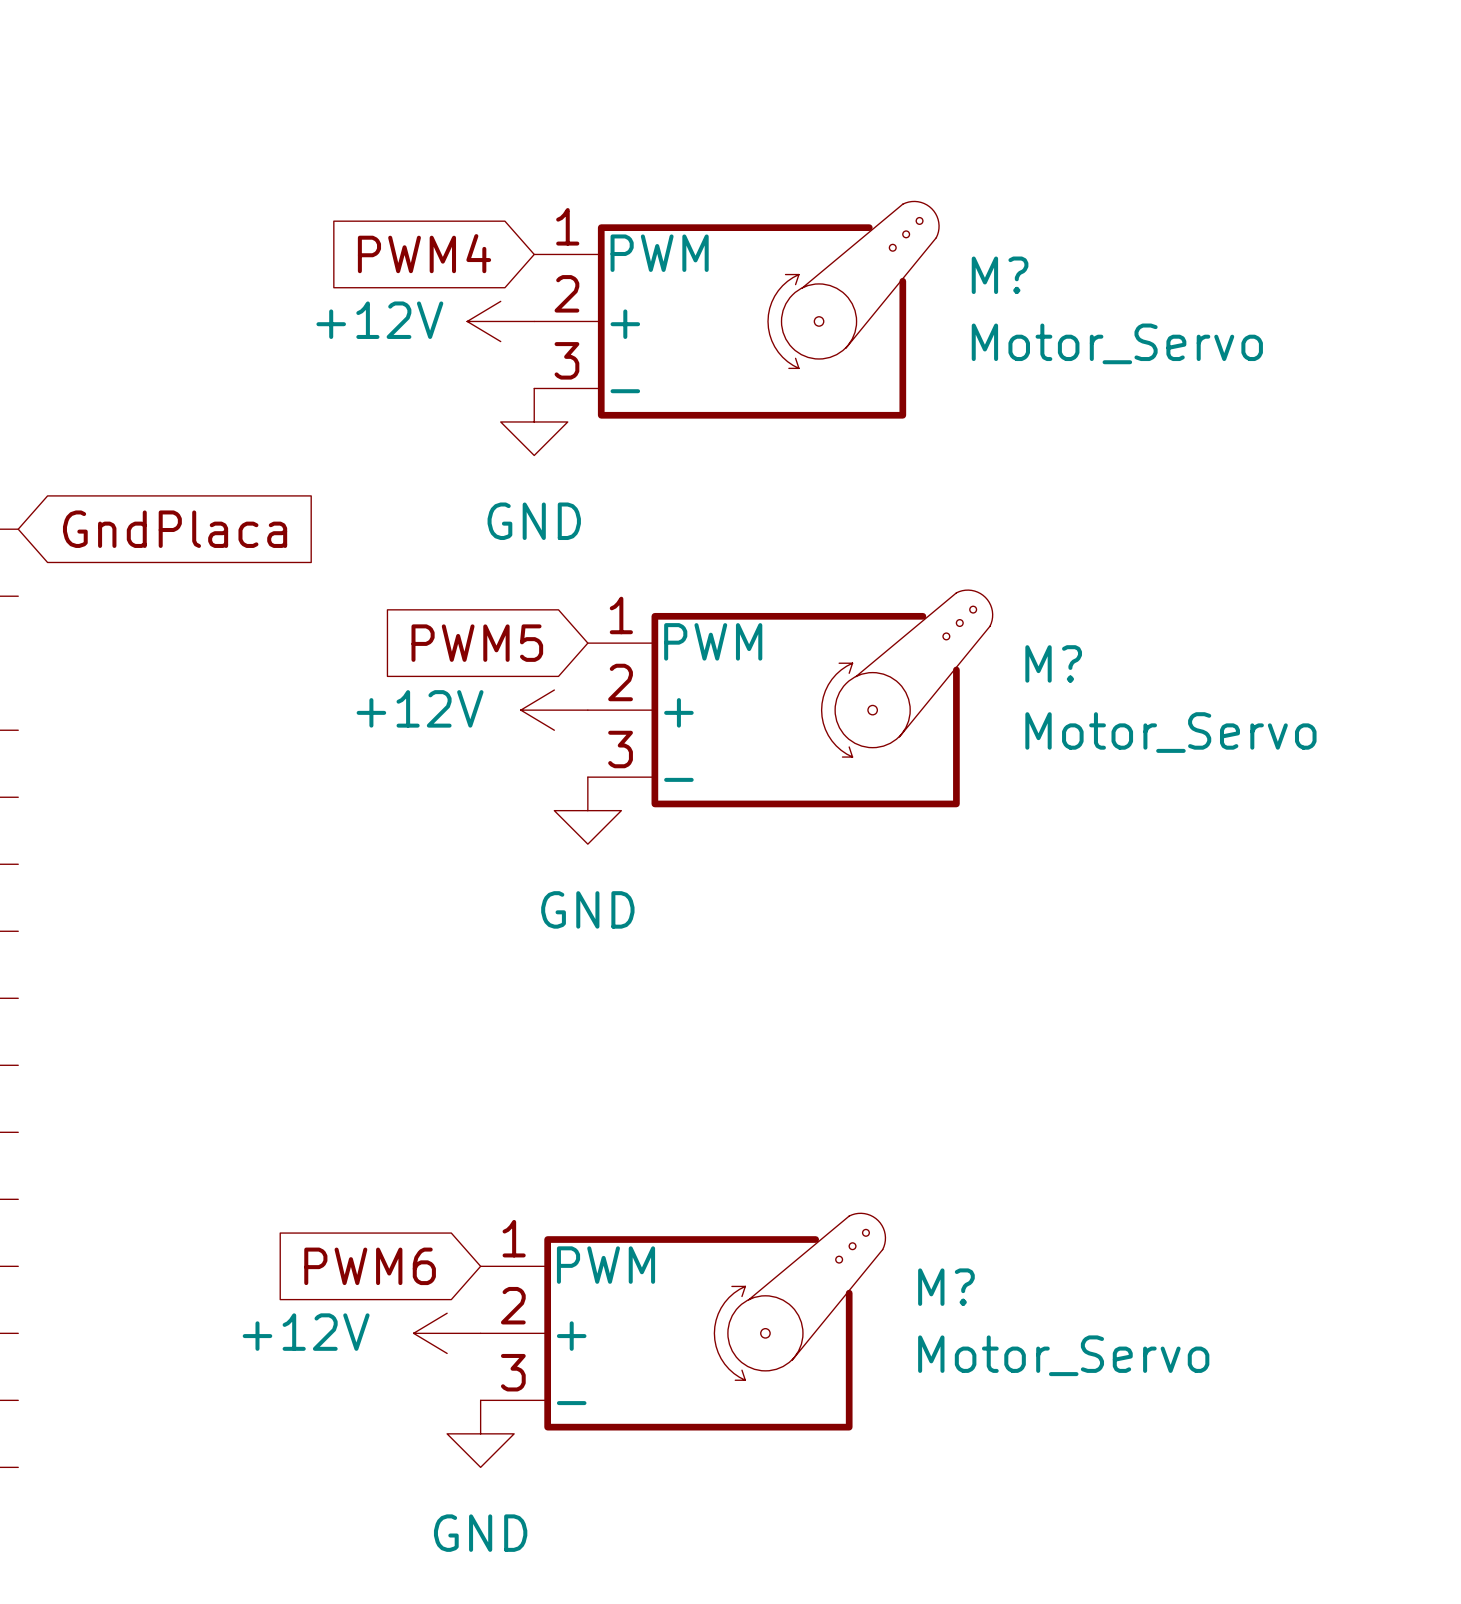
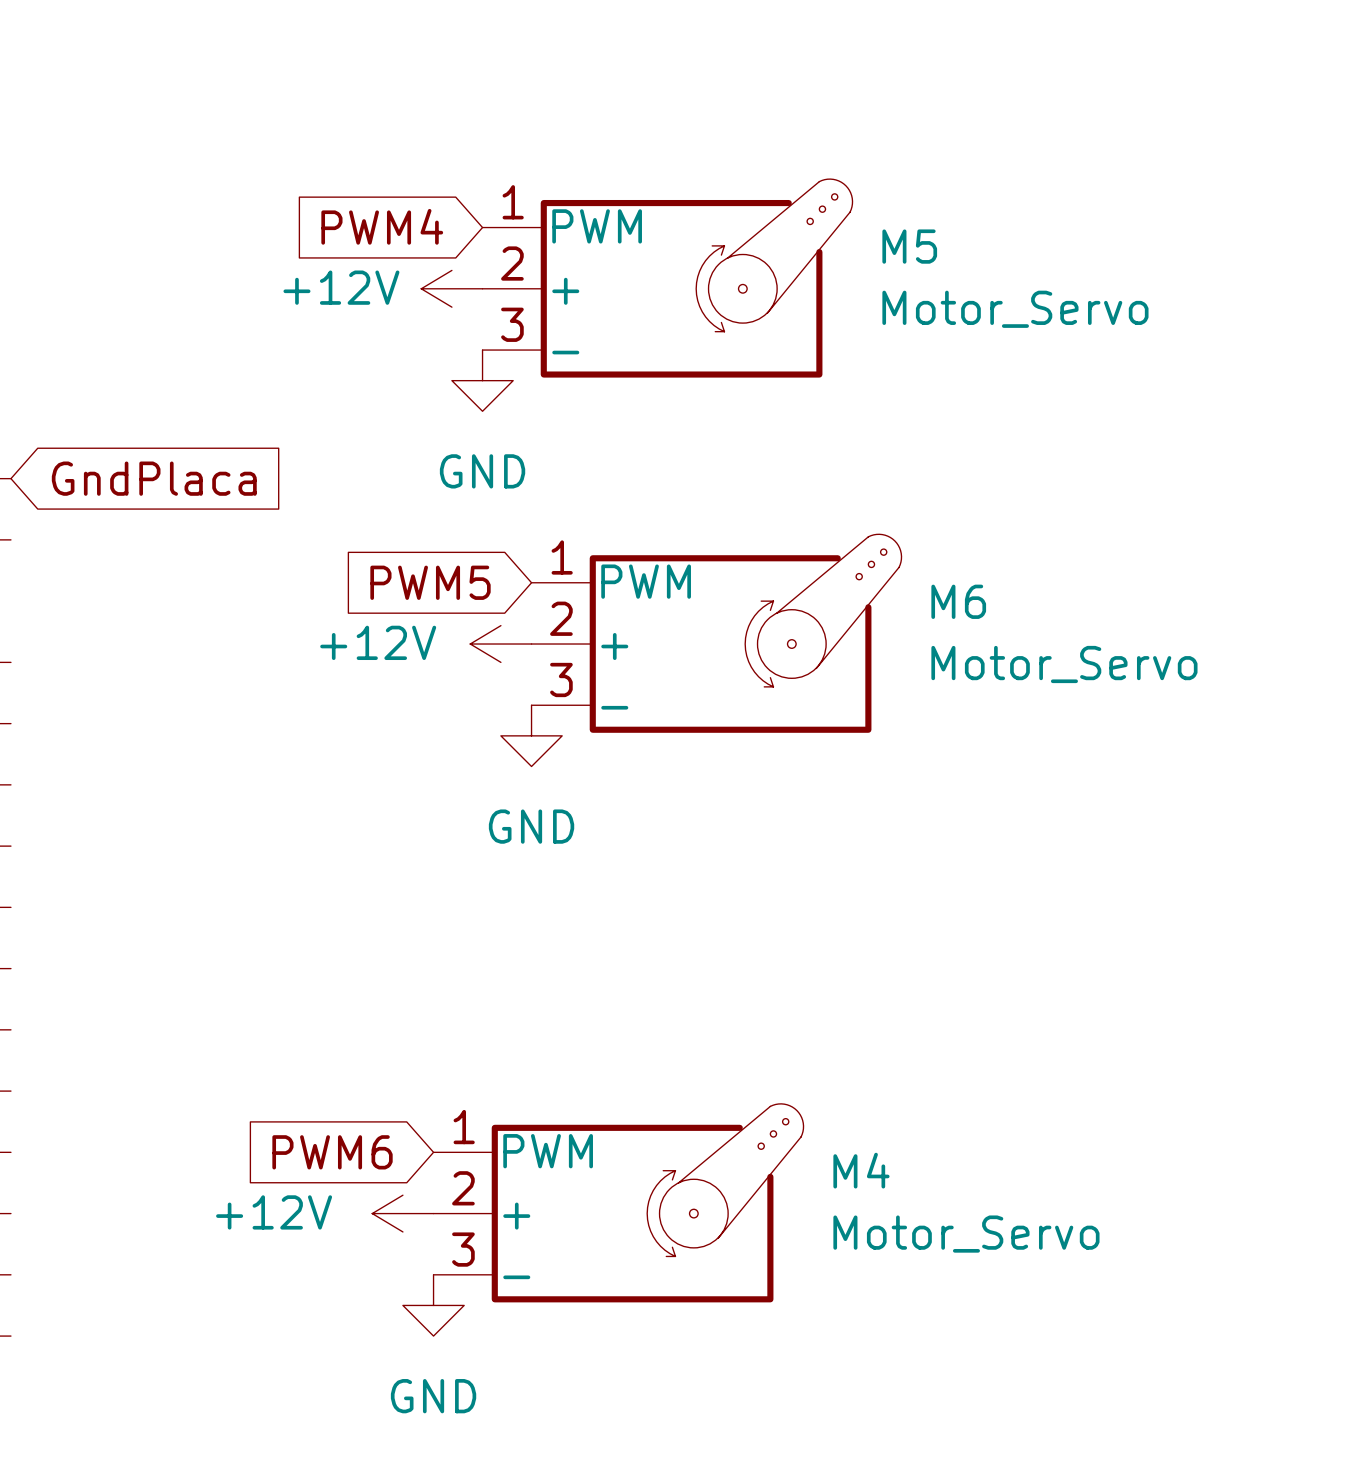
M? name: M? (1000, 275) -> M5 (909, 246)
M? name: M? (1053, 663) -> M6 (958, 601)
M? name: M? (946, 1287) -> M4 (861, 1170)

